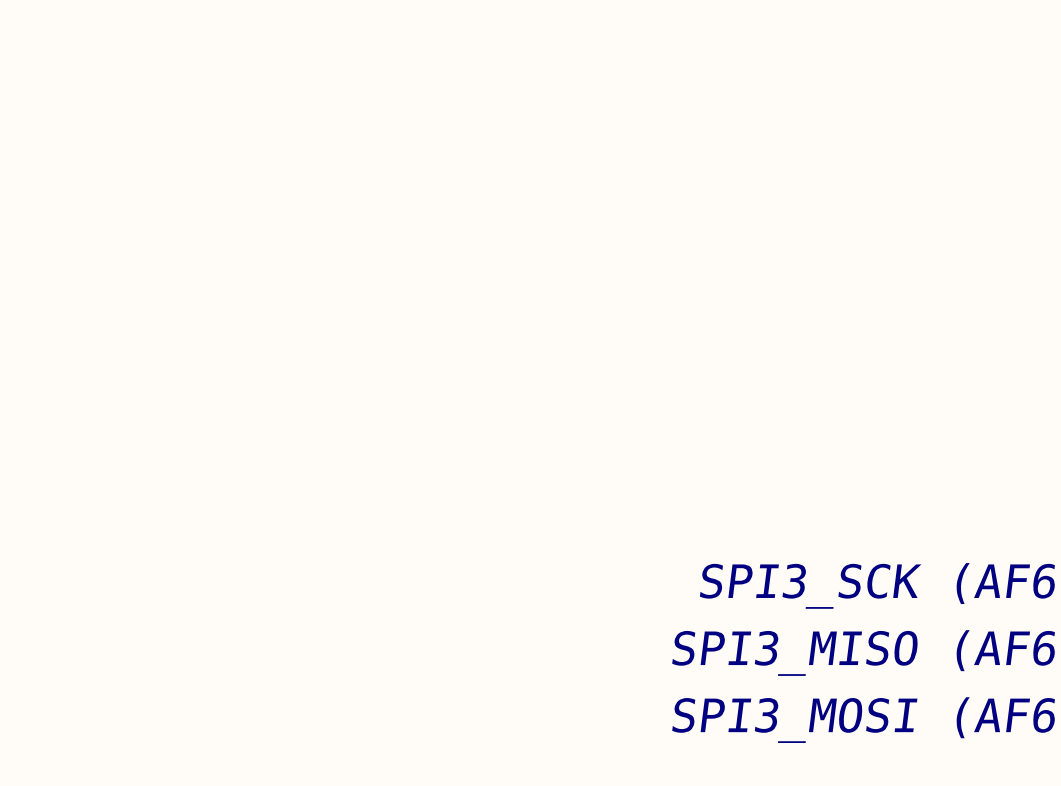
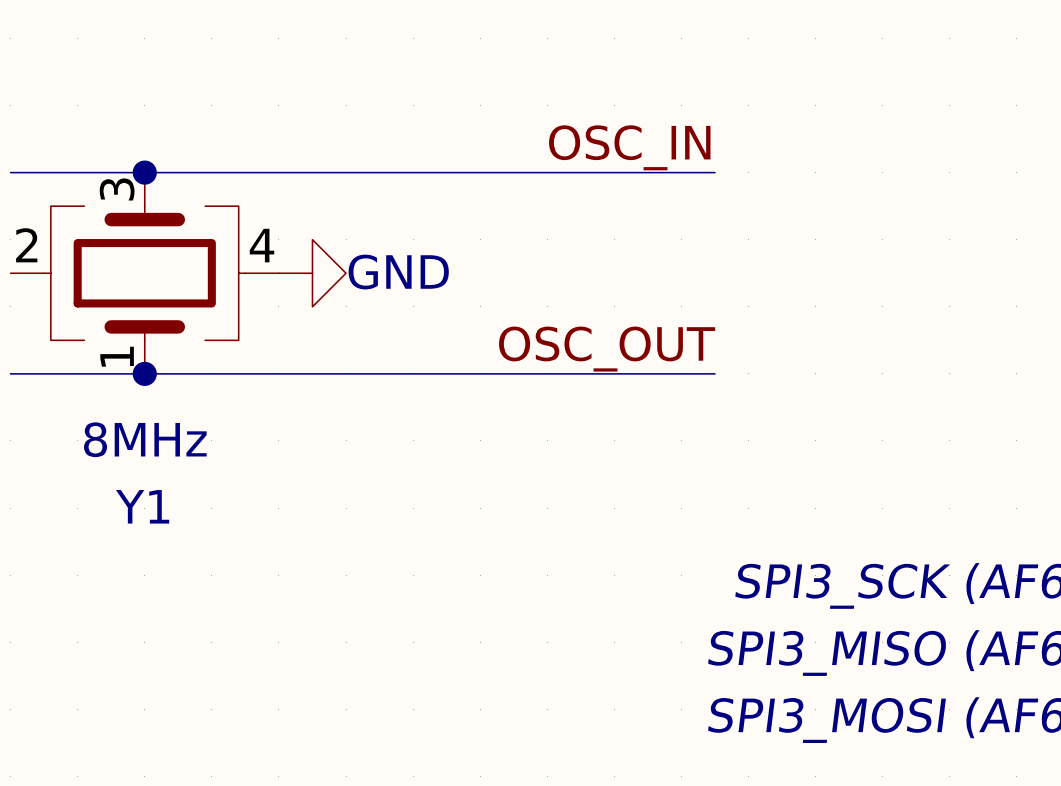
label: none -> OSC_IN (629, 147)
wire: none -> (10, 172) (715, 172)
junction: none -> (144, 172)
Y1: none -> 8MHz (144, 273)
power symbol: none -> GND (312, 273)
label: none -> OSC_OUT (607, 349)
wire: none -> (10, 373) (715, 373)
junction: none -> (144, 373)

